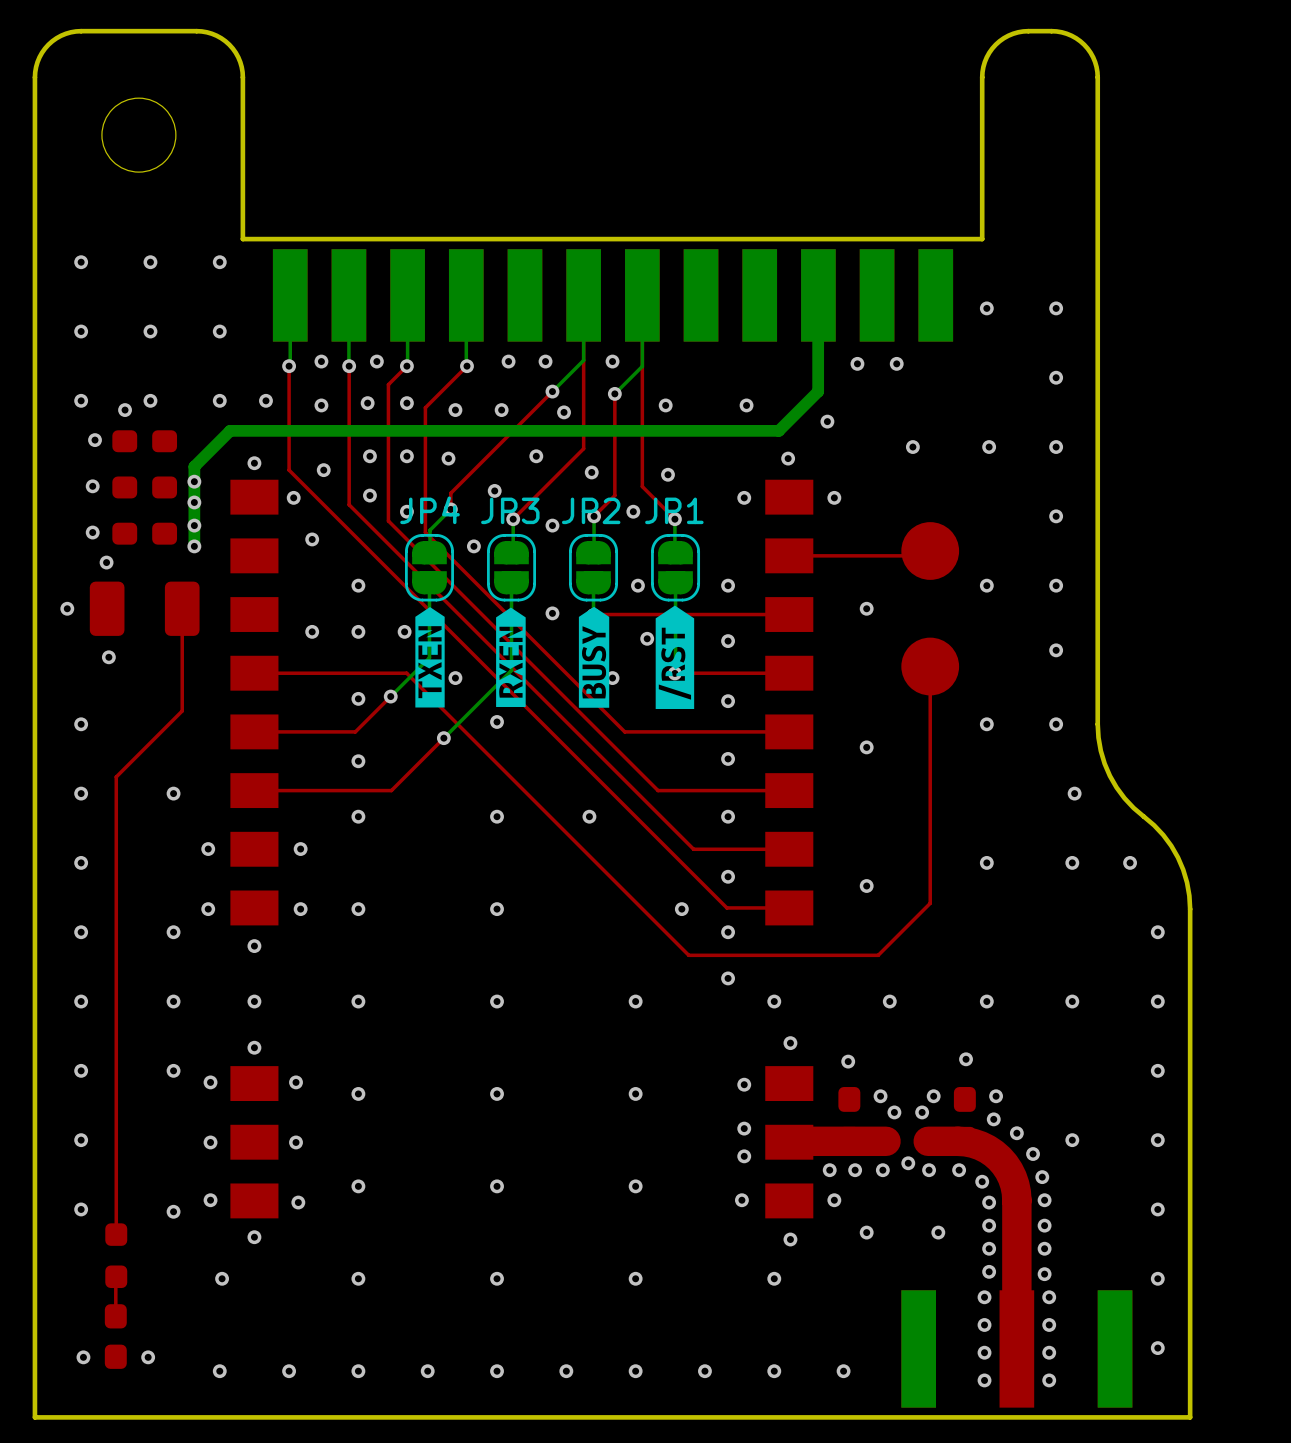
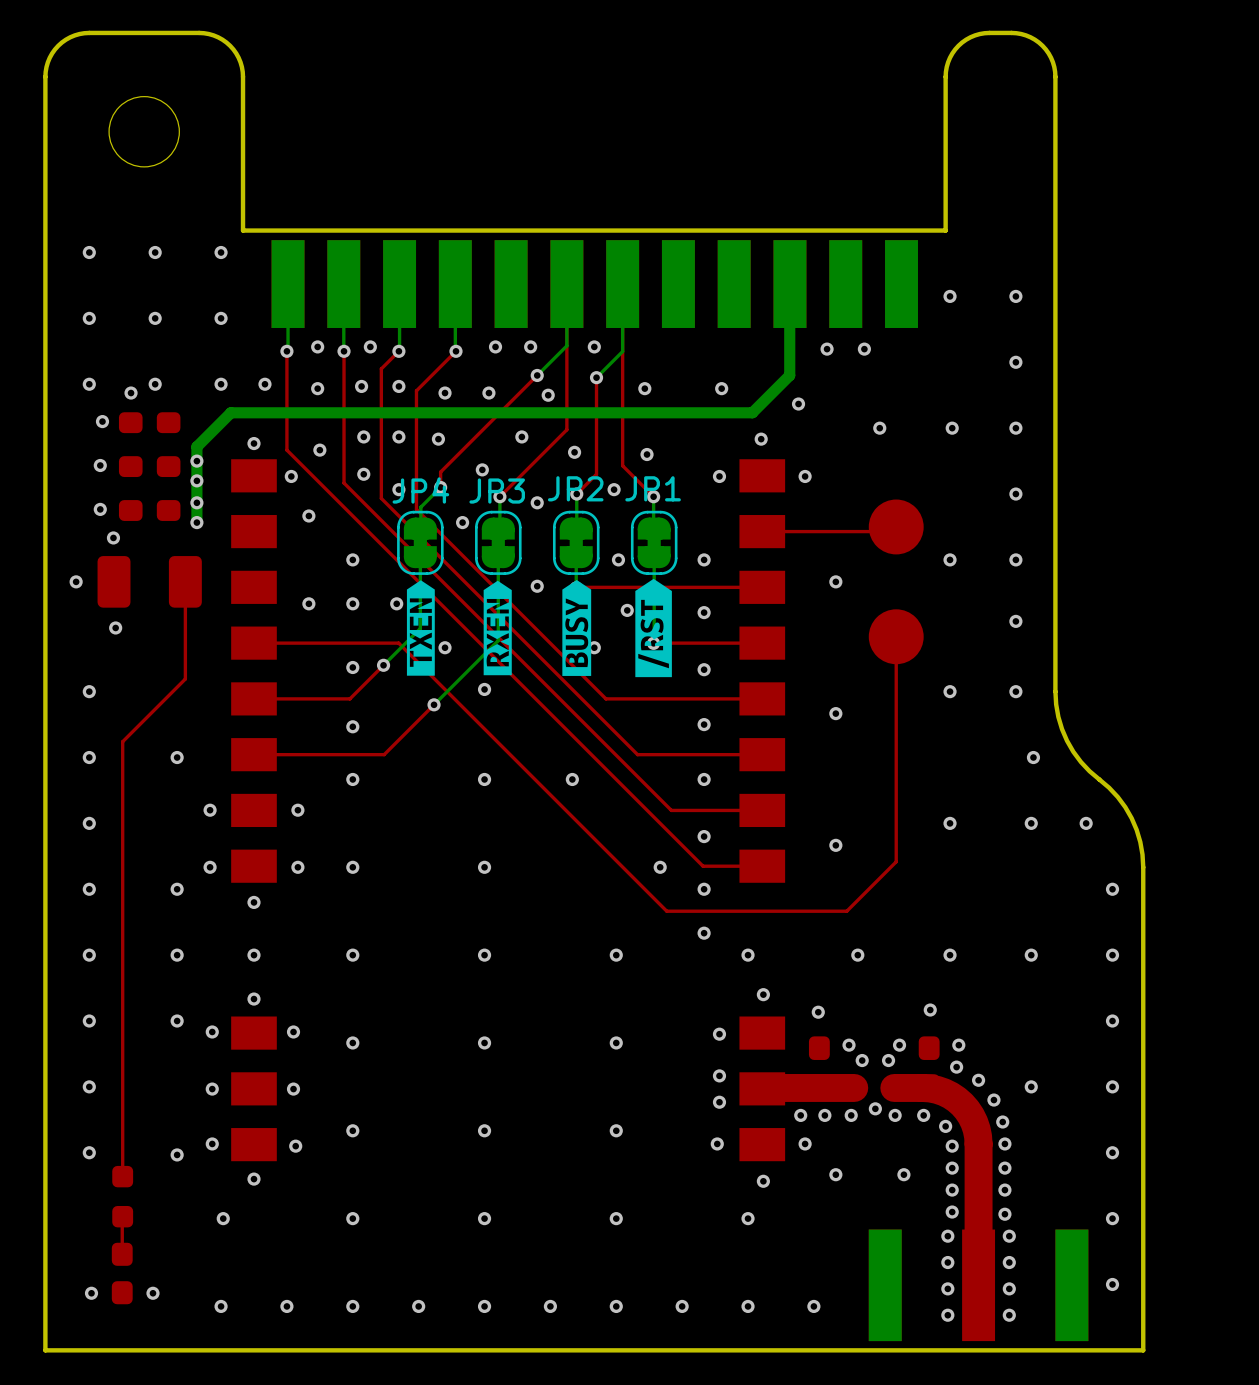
JP4 footprint: [404, 533, 454, 602] -> [397, 510, 444, 575]
JP3 footprint: [487, 533, 536, 602] -> [475, 510, 522, 575]
JP2 footprint: [569, 533, 619, 602] -> [552, 510, 600, 575]
JP1 footprint: [651, 533, 701, 602] -> [630, 510, 678, 575]

